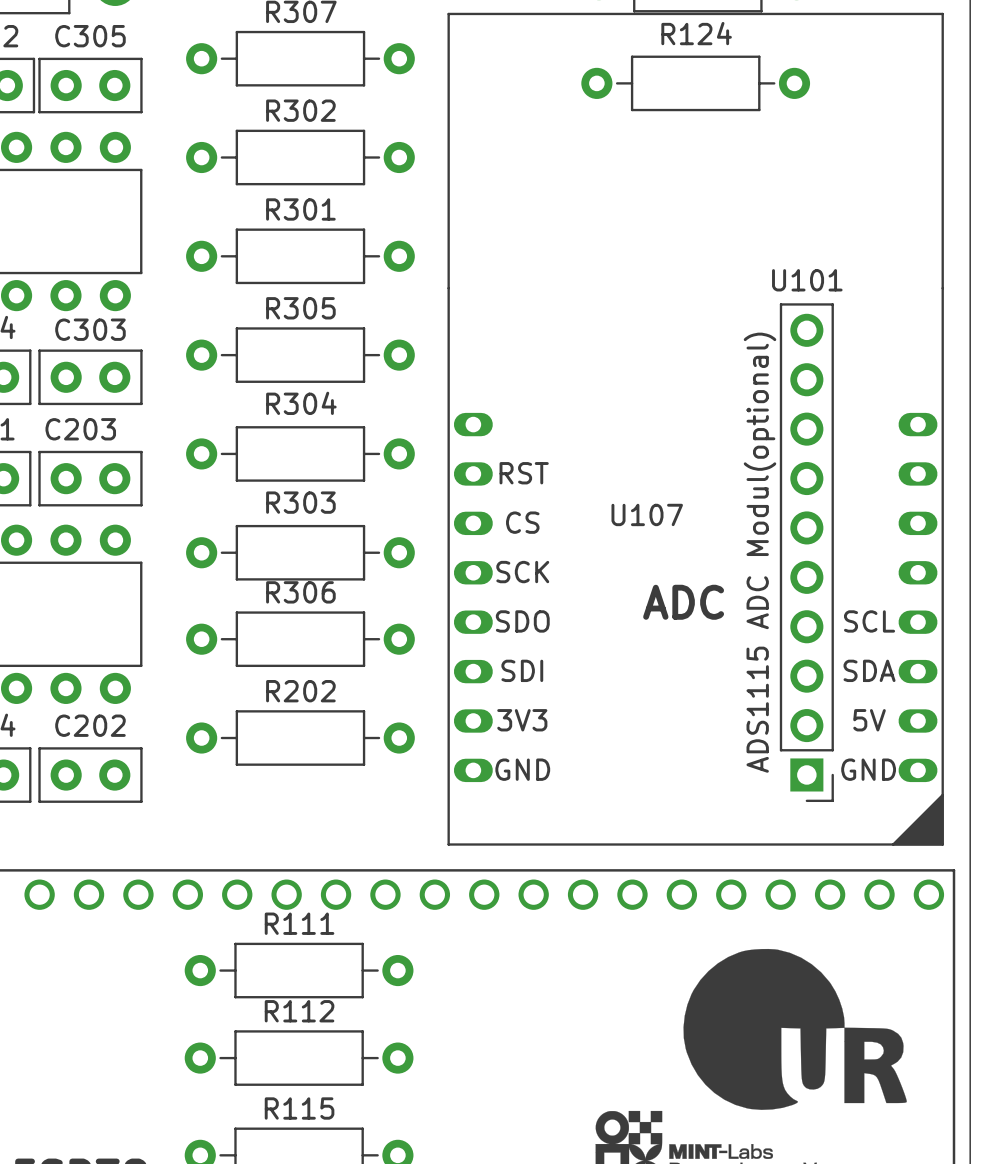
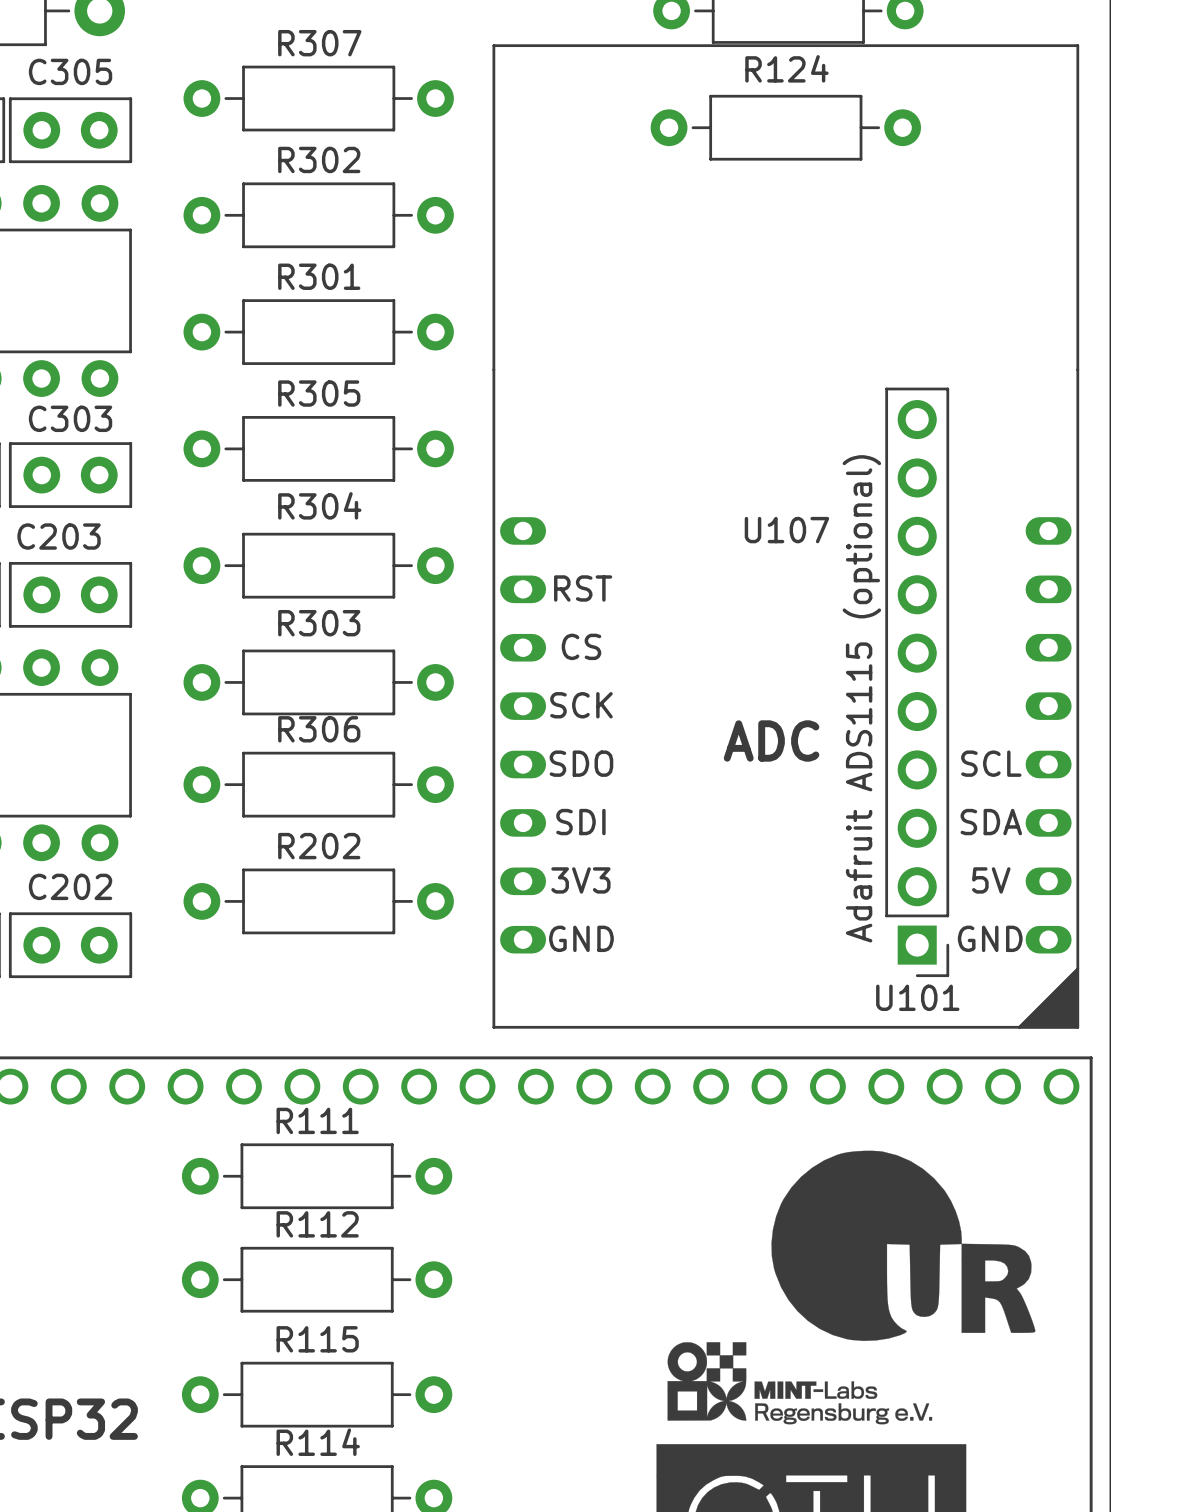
U101 name position: U101 (807, 280) -> U101 (917, 997)
U107 name position: U107 (647, 514) -> U107 (786, 530)
text: ADS1115 ADC Modul(optional) (760, 552) -> Adafruit ADS1115 (optional) (861, 698)

